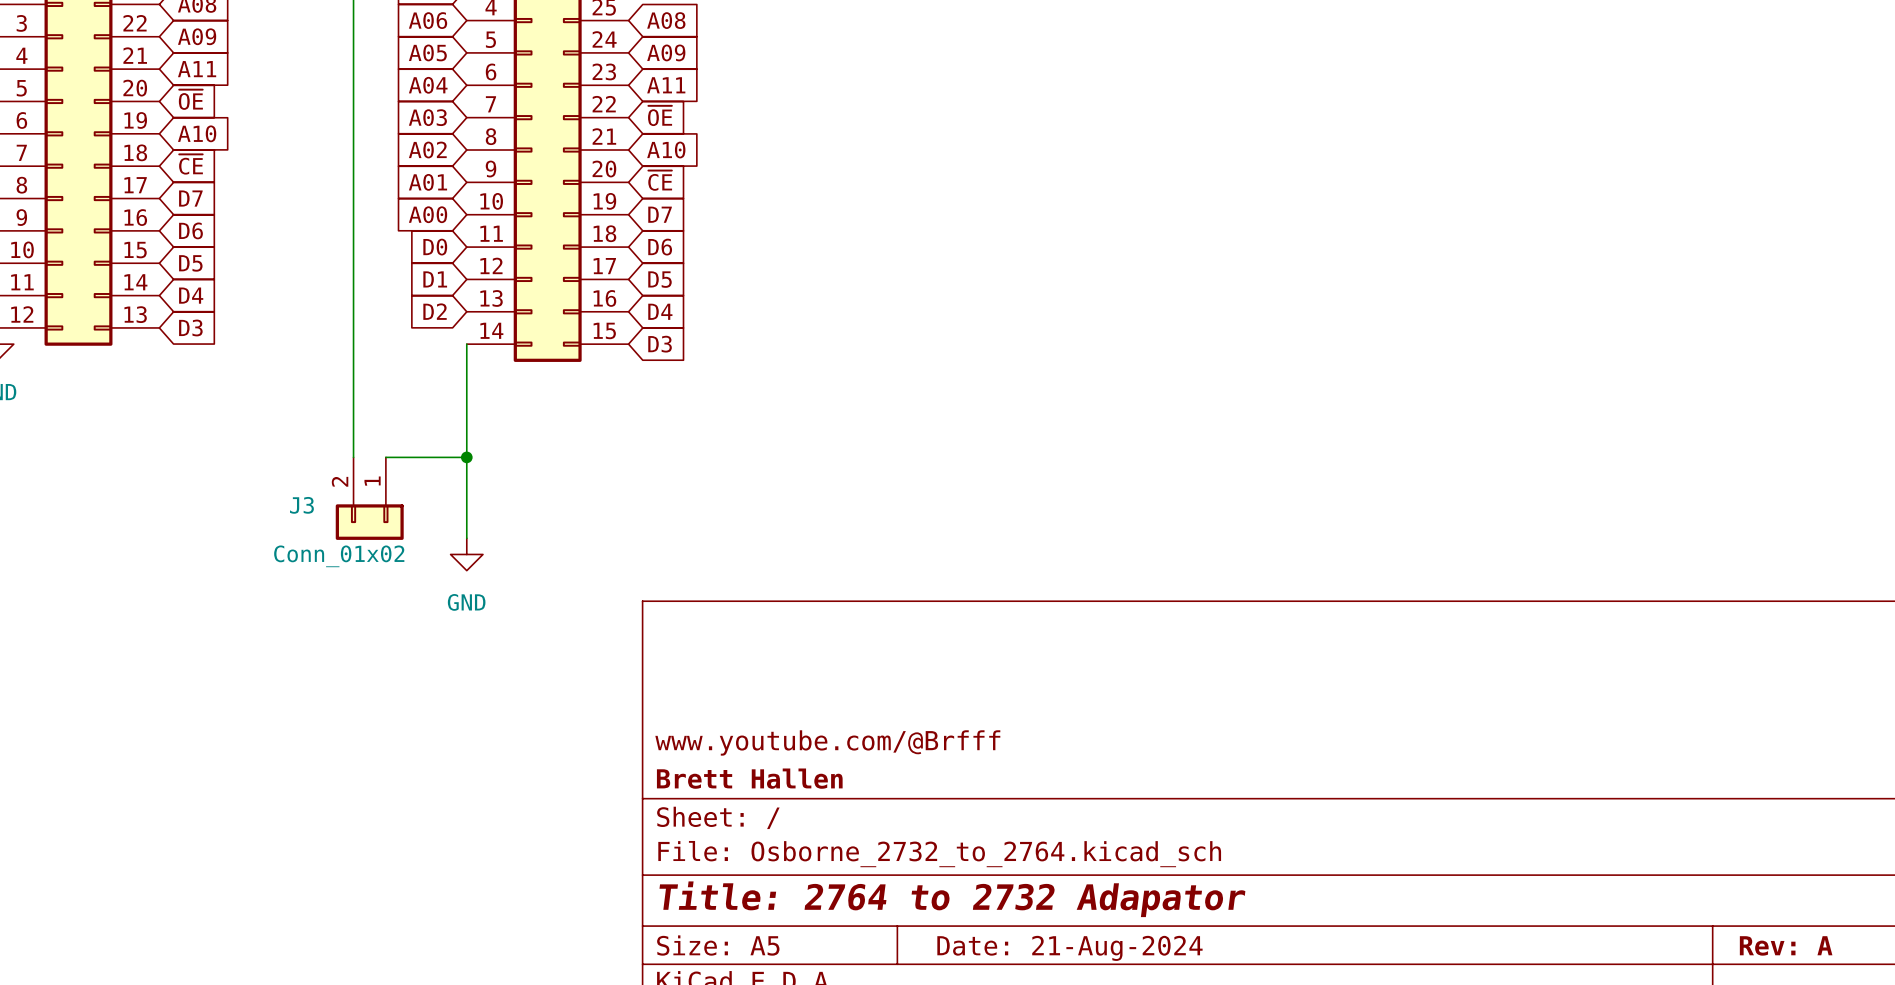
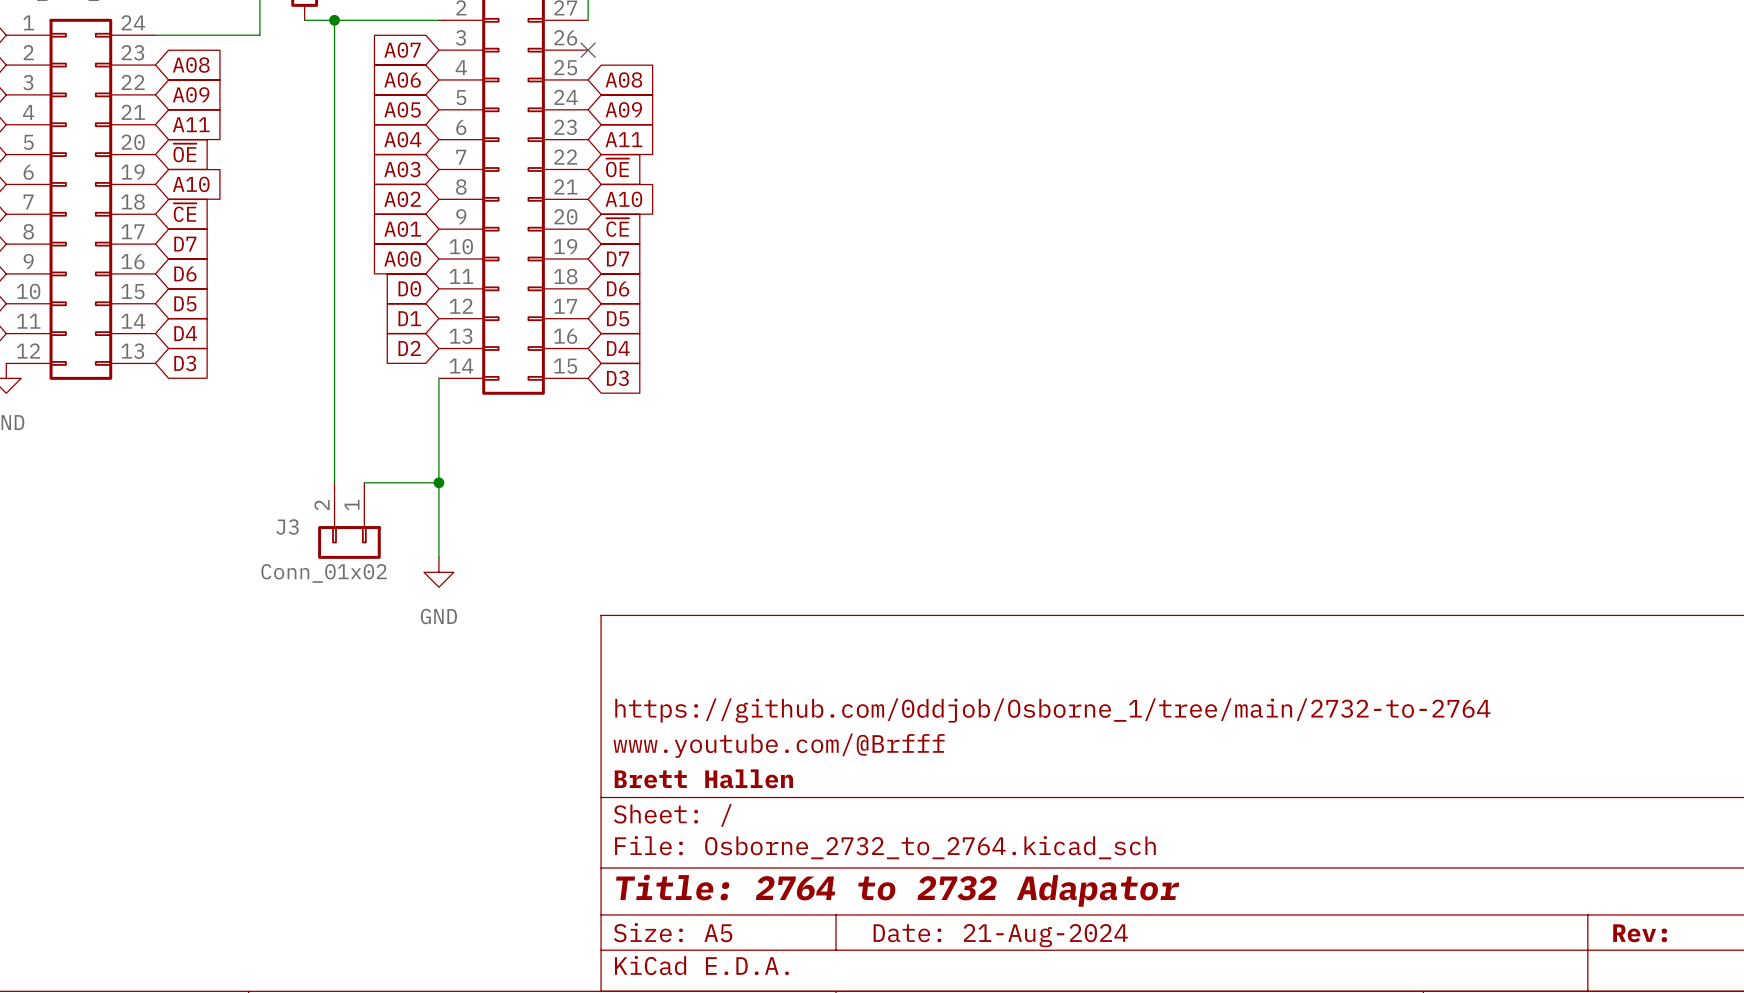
title block: none -> https://github.com/0ddjob/Osborne_1/tree/main/2732-to-2764 (1052, 710)
title block: Rev: A (1786, 945) -> Rev: (1640, 933)

